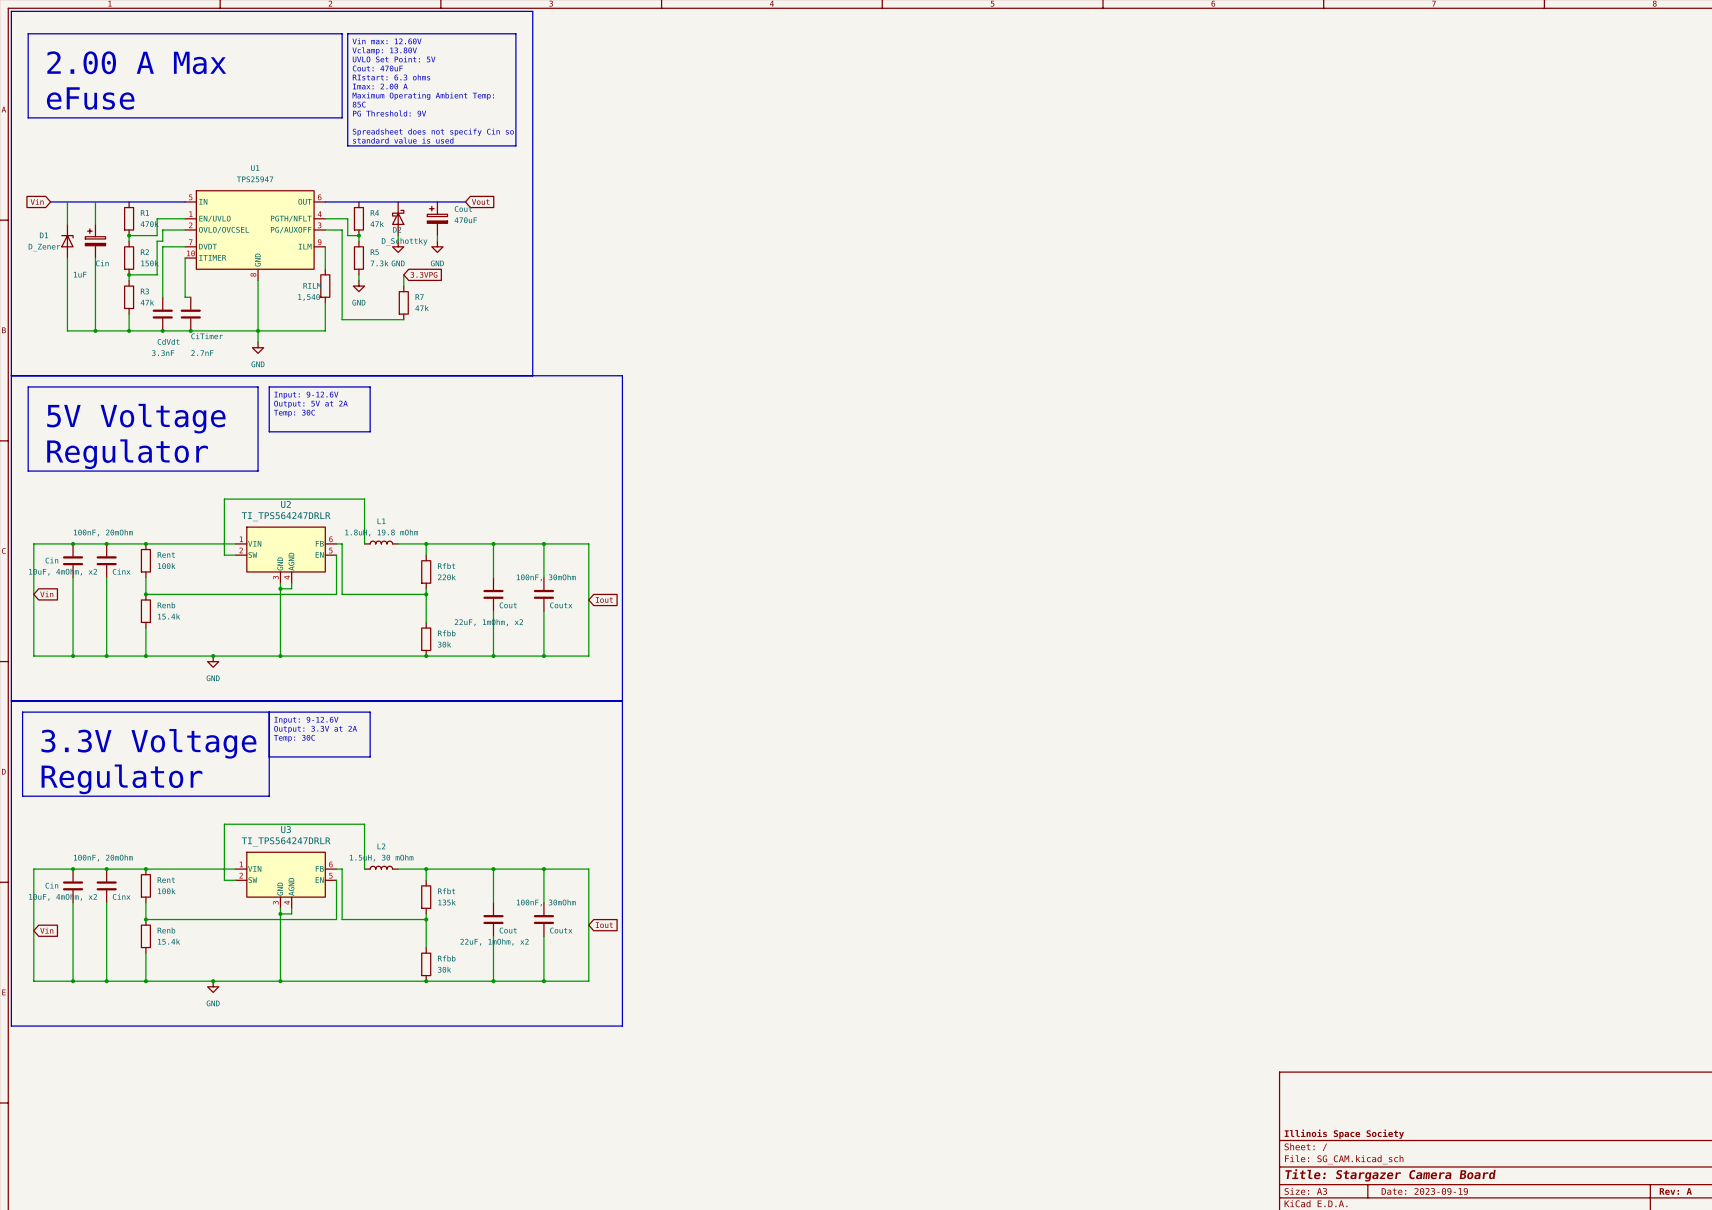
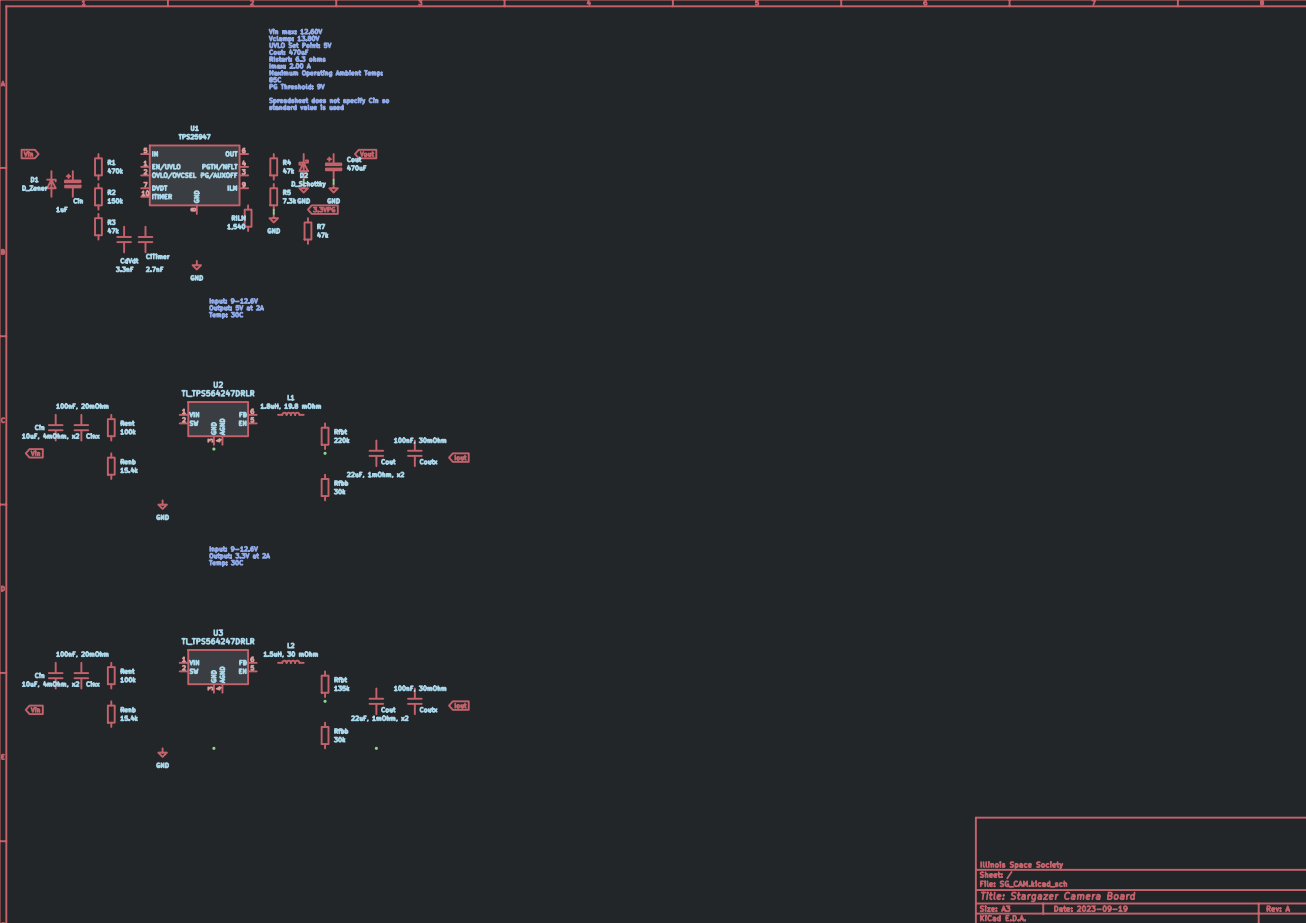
line: (28, 33) (342, 33) (342, 117) (28, 117) (28, 33) -> none
line: (347, 33) (515, 33) (515, 145) (347, 145) (347, 33) -> none
text: 2.00 A Max (136, 62) -> none
text: eFuse (90, 98) -> none
bus: (50, 201) (185, 201) -> none
wire: (67, 201) (67, 224) -> none
wire: (95, 201) (95, 224) -> none
bus: (325, 201) (465, 201) -> none
wire: (185, 218) (157, 218) (157, 235) (129, 235) (129, 241) -> none
wire: (325, 218) (347, 218) (347, 235) (358, 235) (358, 241) -> none
wire: (185, 230) (162, 230) (162, 241) (157, 241) (157, 274) (129, 274) (129, 280) -> none
wire: (325, 230) (342, 230) (342, 319) (403, 319) -> none
junction: (129, 235) -> none
junction: (358, 235) -> none
wire: (185, 246) (162, 246) (162, 297) -> none
wire: (325, 246) (325, 269) -> none
wire: (67, 258) (67, 330) (325, 330) (325, 302) -> none
wire: (95, 258) (95, 330) -> none
wire: (185, 258) (185, 297) (190, 297) -> none
junction: (129, 274) -> none
wire: (403, 274) (403, 286) -> none
wire: (258, 280) (258, 342) -> none
wire: (129, 314) (129, 330) -> none
junction: (95, 330) -> none
junction: (129, 330) -> none
junction: (162, 330) -> none
junction: (190, 330) -> none
junction: (258, 330) -> none
line: (11, 375) (622, 375) (622, 1026) (11, 1026) (11, 11) (532, 11) (532, 375) -> none
line: (28, 386) (258, 386) (258, 471) (28, 471) (28, 386) -> none
line: (269, 386) (269, 431) (370, 431) (370, 386) (269, 386) -> none
text: 5V Voltage (136, 418) -> none
text: Regulator (127, 454) -> none
junction: (73, 543) -> none
junction: (106, 543) -> none
junction: (145, 543) -> none
wire: (235, 543) (33, 543) (33, 656) (588, 656) (588, 543) (398, 543) -> none
wire: (336, 543) (342, 543) (342, 594) (426, 594) -> none
wire: (364, 543) (364, 499) (224, 499) (224, 555) (235, 555) -> none
wire: (426, 543) (426, 555) -> none
junction: (426, 543) -> none
wire: (493, 543) (493, 577) -> none
junction: (493, 543) -> none
wire: (543, 543) (543, 577) -> none
junction: (543, 543) -> none
wire: (336, 555) (336, 594) (145, 594) (145, 577) -> none
wire: (73, 577) (73, 656) -> none
wire: (106, 577) (106, 656) -> none
wire: (280, 583) (280, 656) -> none
wire: (291, 583) (291, 588) (280, 588) -> none
wire: (426, 588) (426, 622) -> none
junction: (145, 594) -> none
wire: (493, 611) (493, 656) -> none
wire: (543, 611) (543, 656) -> none
wire: (145, 628) (145, 656) -> none
junction: (73, 656) -> none
junction: (106, 656) -> none
junction: (145, 656) -> none
junction: (213, 656) -> none
junction: (280, 656) -> none
junction: (426, 656) -> none
junction: (493, 656) -> none
junction: (543, 656) -> none
line: (11, 700) (622, 700) -> none
line: (269, 712) (269, 796) (22, 796) (22, 712) (370, 712) (370, 756) (269, 756) -> none
text: 3.3V Voltage (148, 743) -> none
text: Regulator (121, 779) -> none
junction: (73, 869) -> none
junction: (106, 869) -> none
junction: (145, 869) -> none
wire: (235, 869) (33, 869) (33, 981) (588, 981) (588, 869) (398, 869) -> none
wire: (336, 869) (342, 869) (342, 919) (426, 919) -> none
wire: (364, 869) (364, 824) (224, 824) (224, 880) (235, 880) -> none
wire: (426, 869) (426, 880) -> none
junction: (426, 869) -> none
wire: (493, 869) (493, 902) -> none
junction: (493, 869) -> none
wire: (543, 869) (543, 902) -> none
junction: (543, 869) -> none
wire: (336, 880) (336, 919) (145, 919) (145, 902) -> none
wire: (73, 902) (73, 981) -> none
wire: (106, 902) (106, 981) -> none
wire: (280, 908) (280, 981) -> none
wire: (291, 908) (291, 913) (280, 913) -> none
junction: (280, 913) -> none
wire: (426, 913) (426, 947) -> none
junction: (145, 919) -> none
wire: (493, 936) (493, 981) -> none
wire: (543, 936) (543, 981) -> none
wire: (145, 953) (145, 981) -> none
junction: (73, 981) -> none
junction: (106, 981) -> none
junction: (145, 981) -> none
junction: (213, 981) -> none
junction: (426, 981) -> none
junction: (543, 981) -> none

